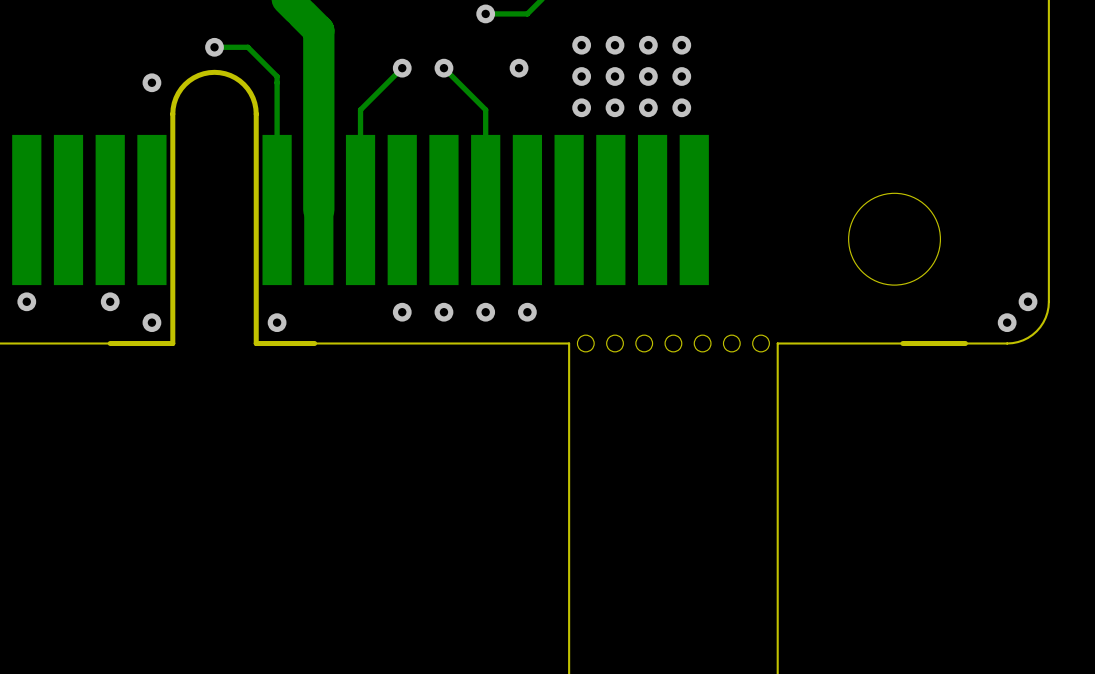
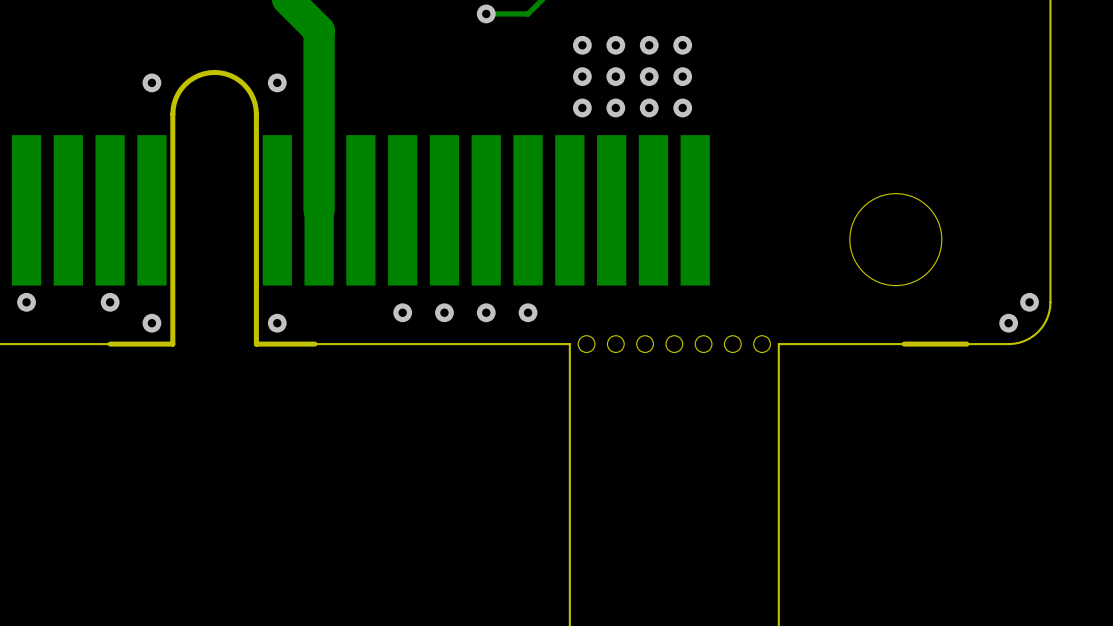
track: (214, 47) (247, 47) (277, 76) (277, 210) -> none
via: (214, 47) -> none
track: (402, 68) (360, 109) (360, 210) -> none
via: (402, 68) -> none
track: (443, 68) (485, 109) (485, 210) -> none
via: (443, 68) -> none
via: (519, 68) -> none
via: none -> (277, 82)

